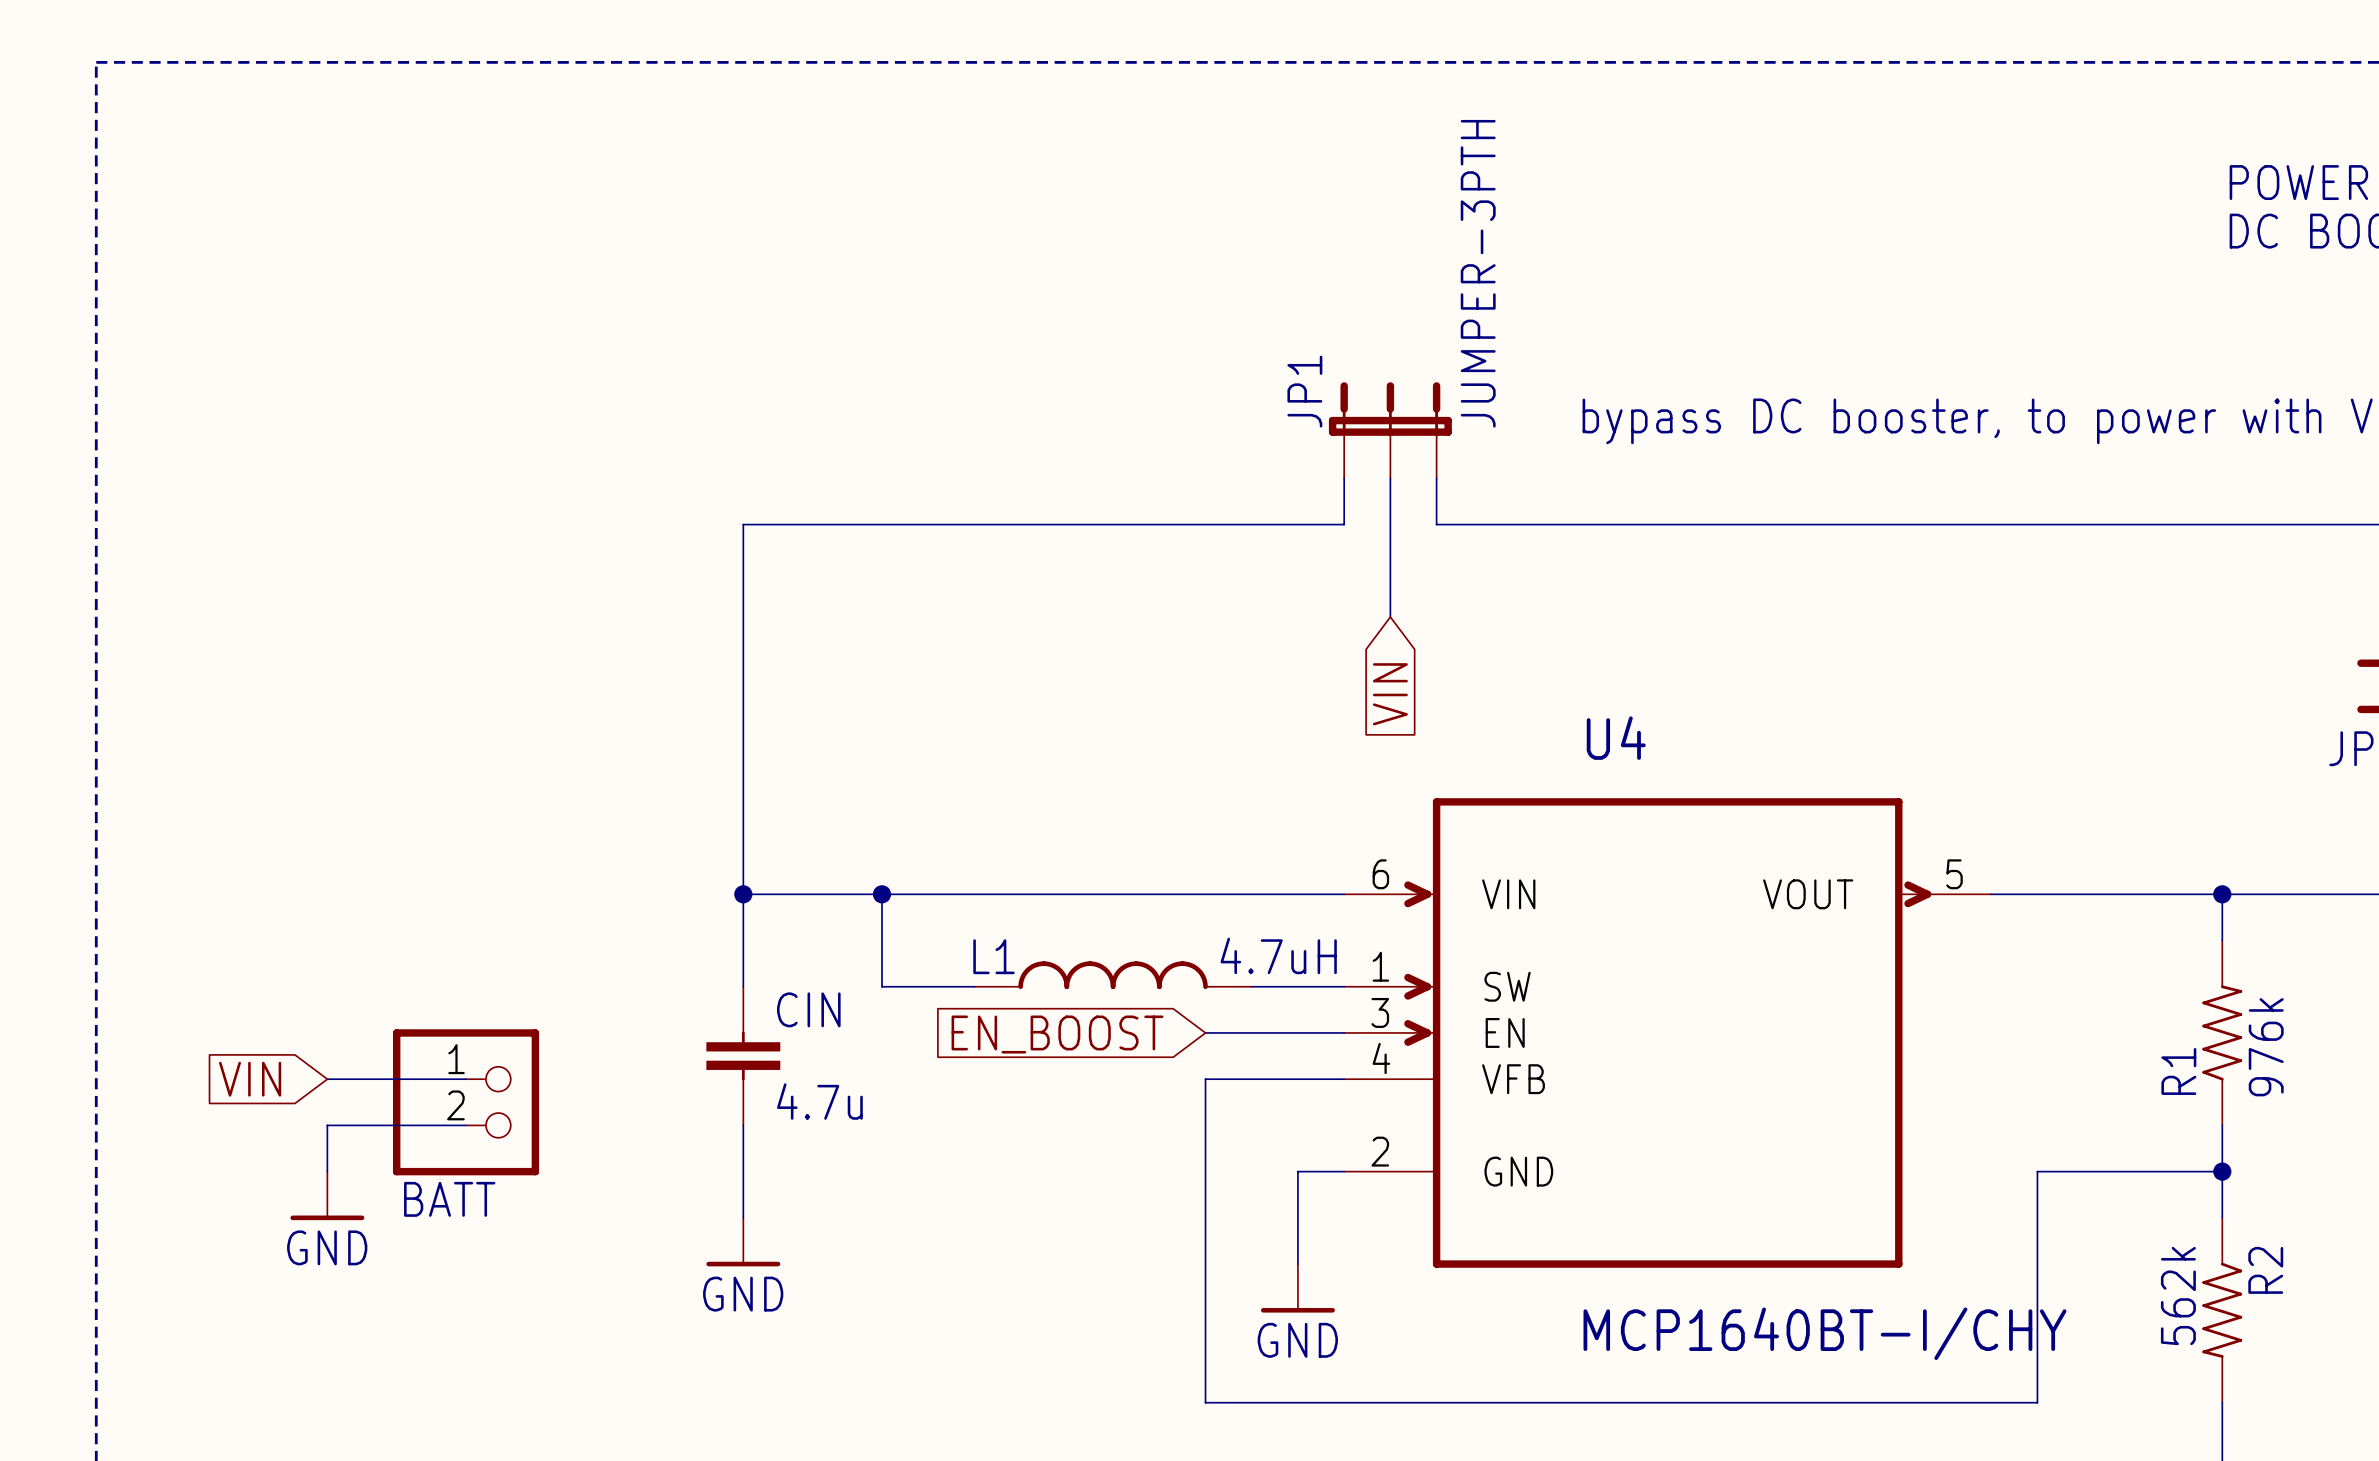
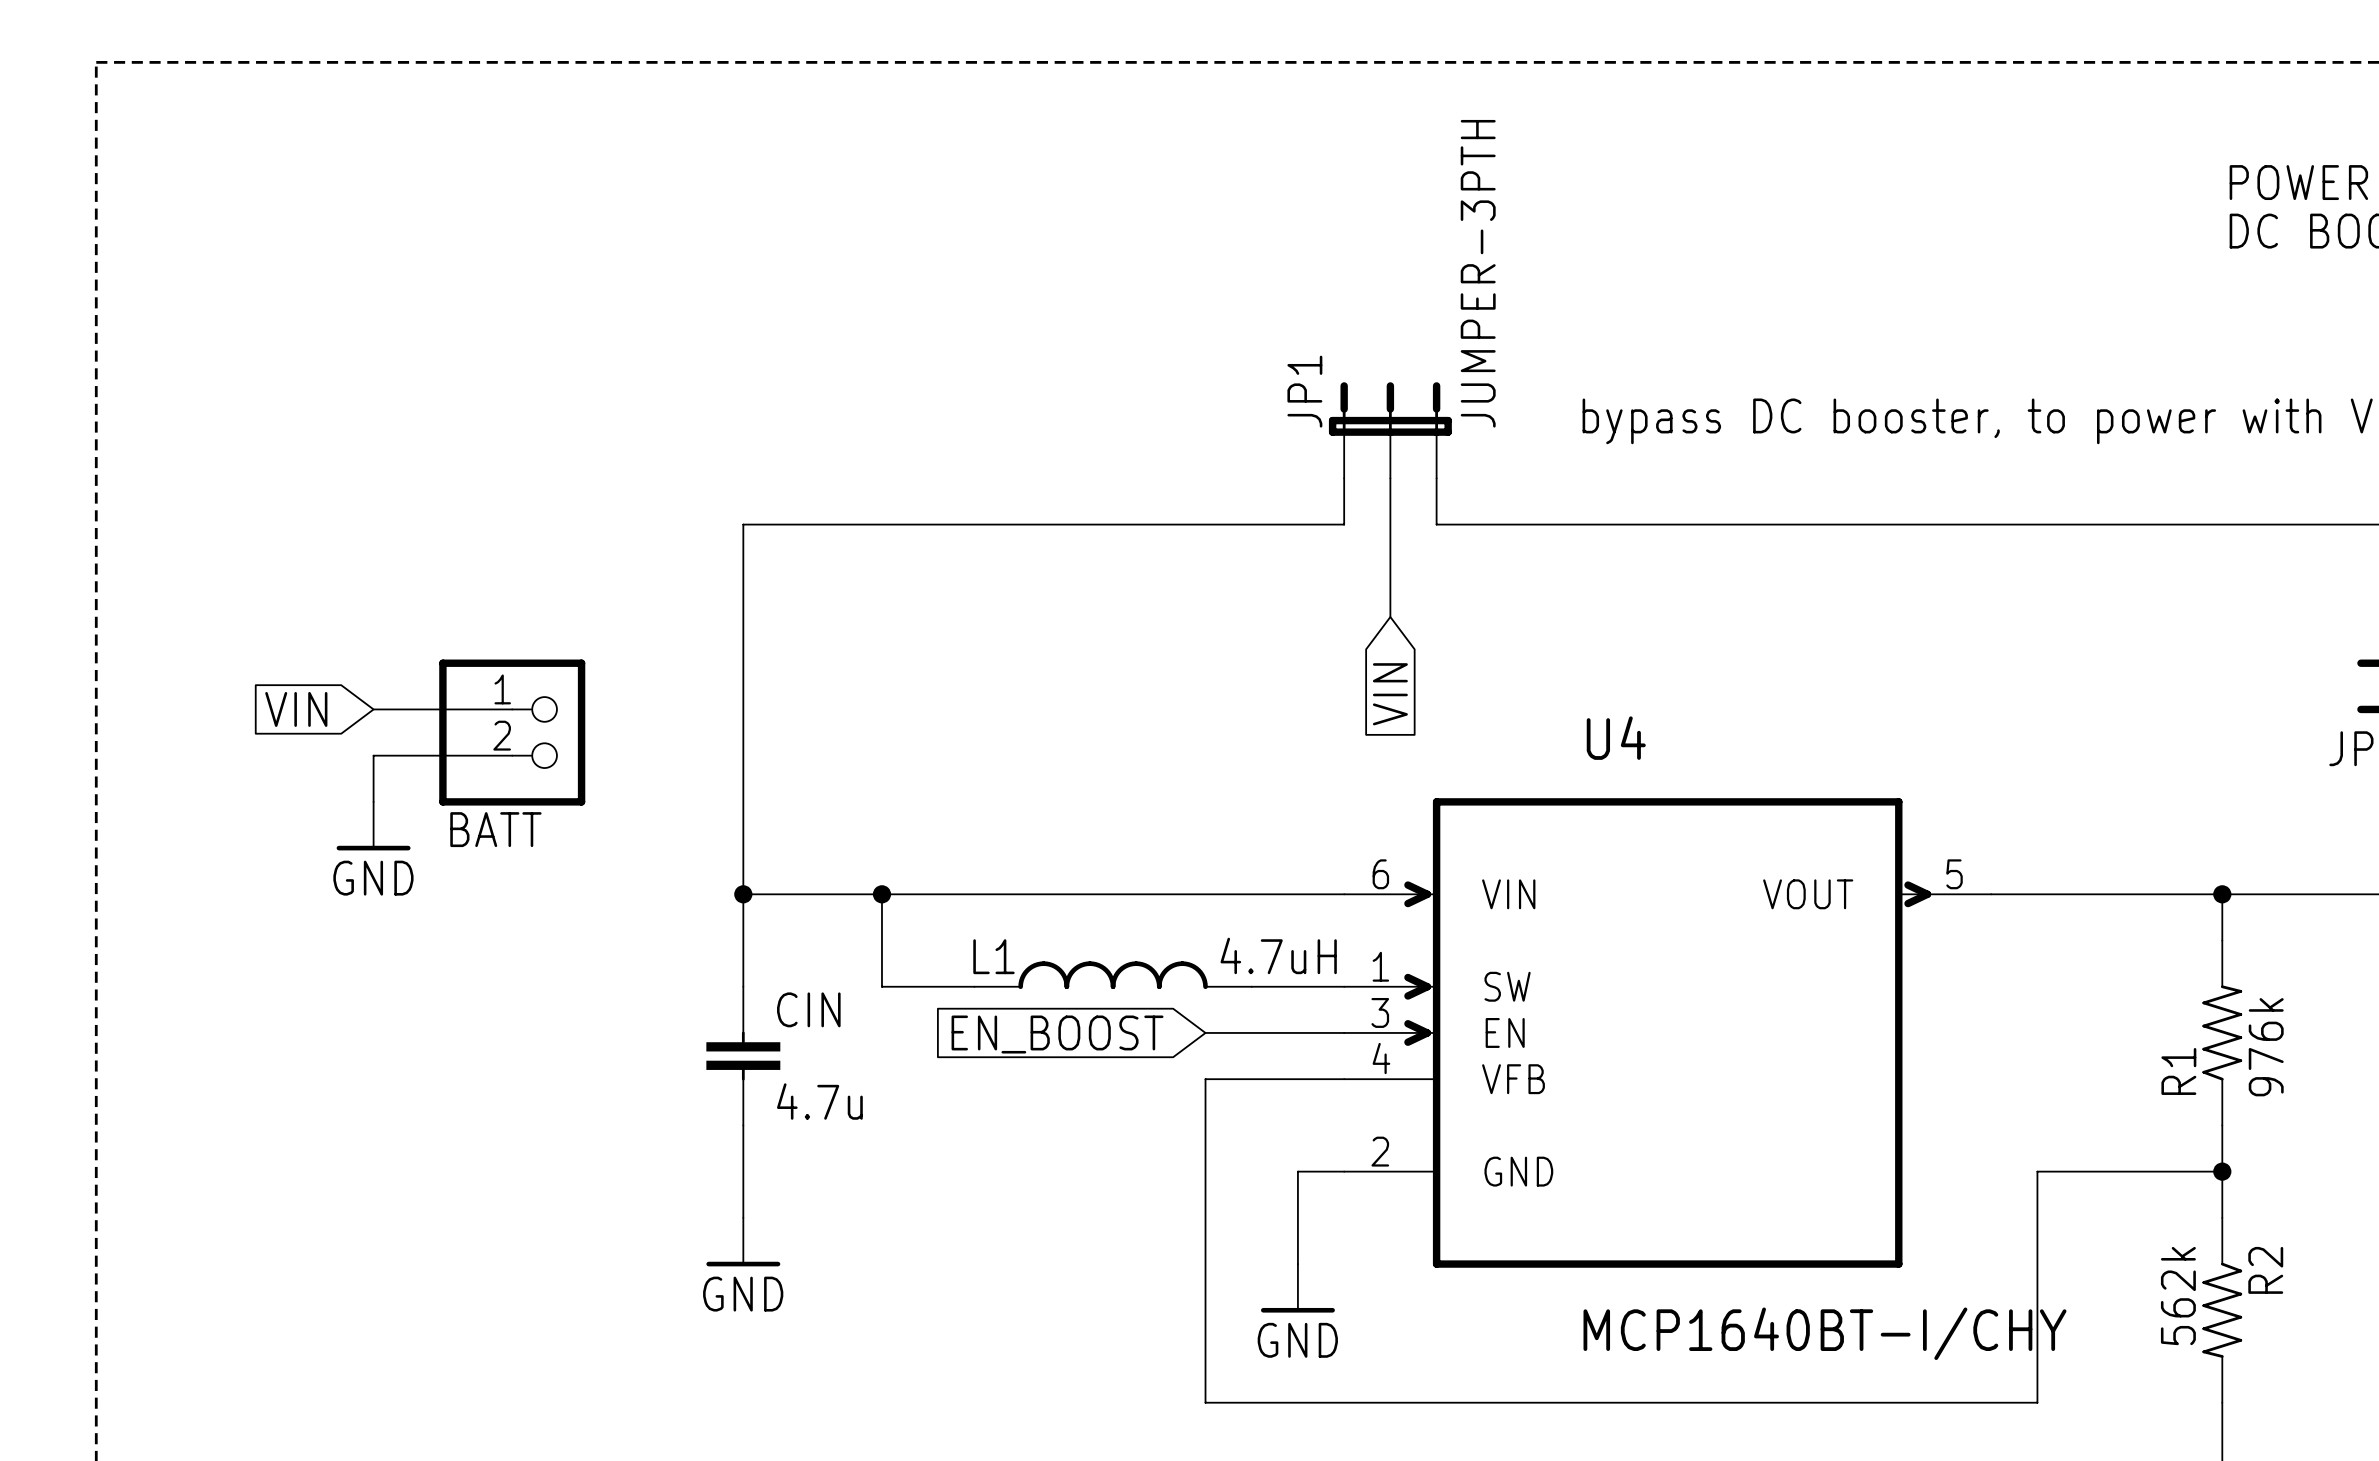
global label position: VIN (250, 1079) -> VIN (296, 709)
wire: (327, 1079) (466, 1079) -> (373, 709) (512, 709)
BATT position: (466, 1102) -> (512, 732)
wire: (466, 1125) (327, 1125) (327, 1171) -> (512, 755) (373, 755) (373, 801)
power symbol position: GND (327, 1195) -> GND (373, 826)

